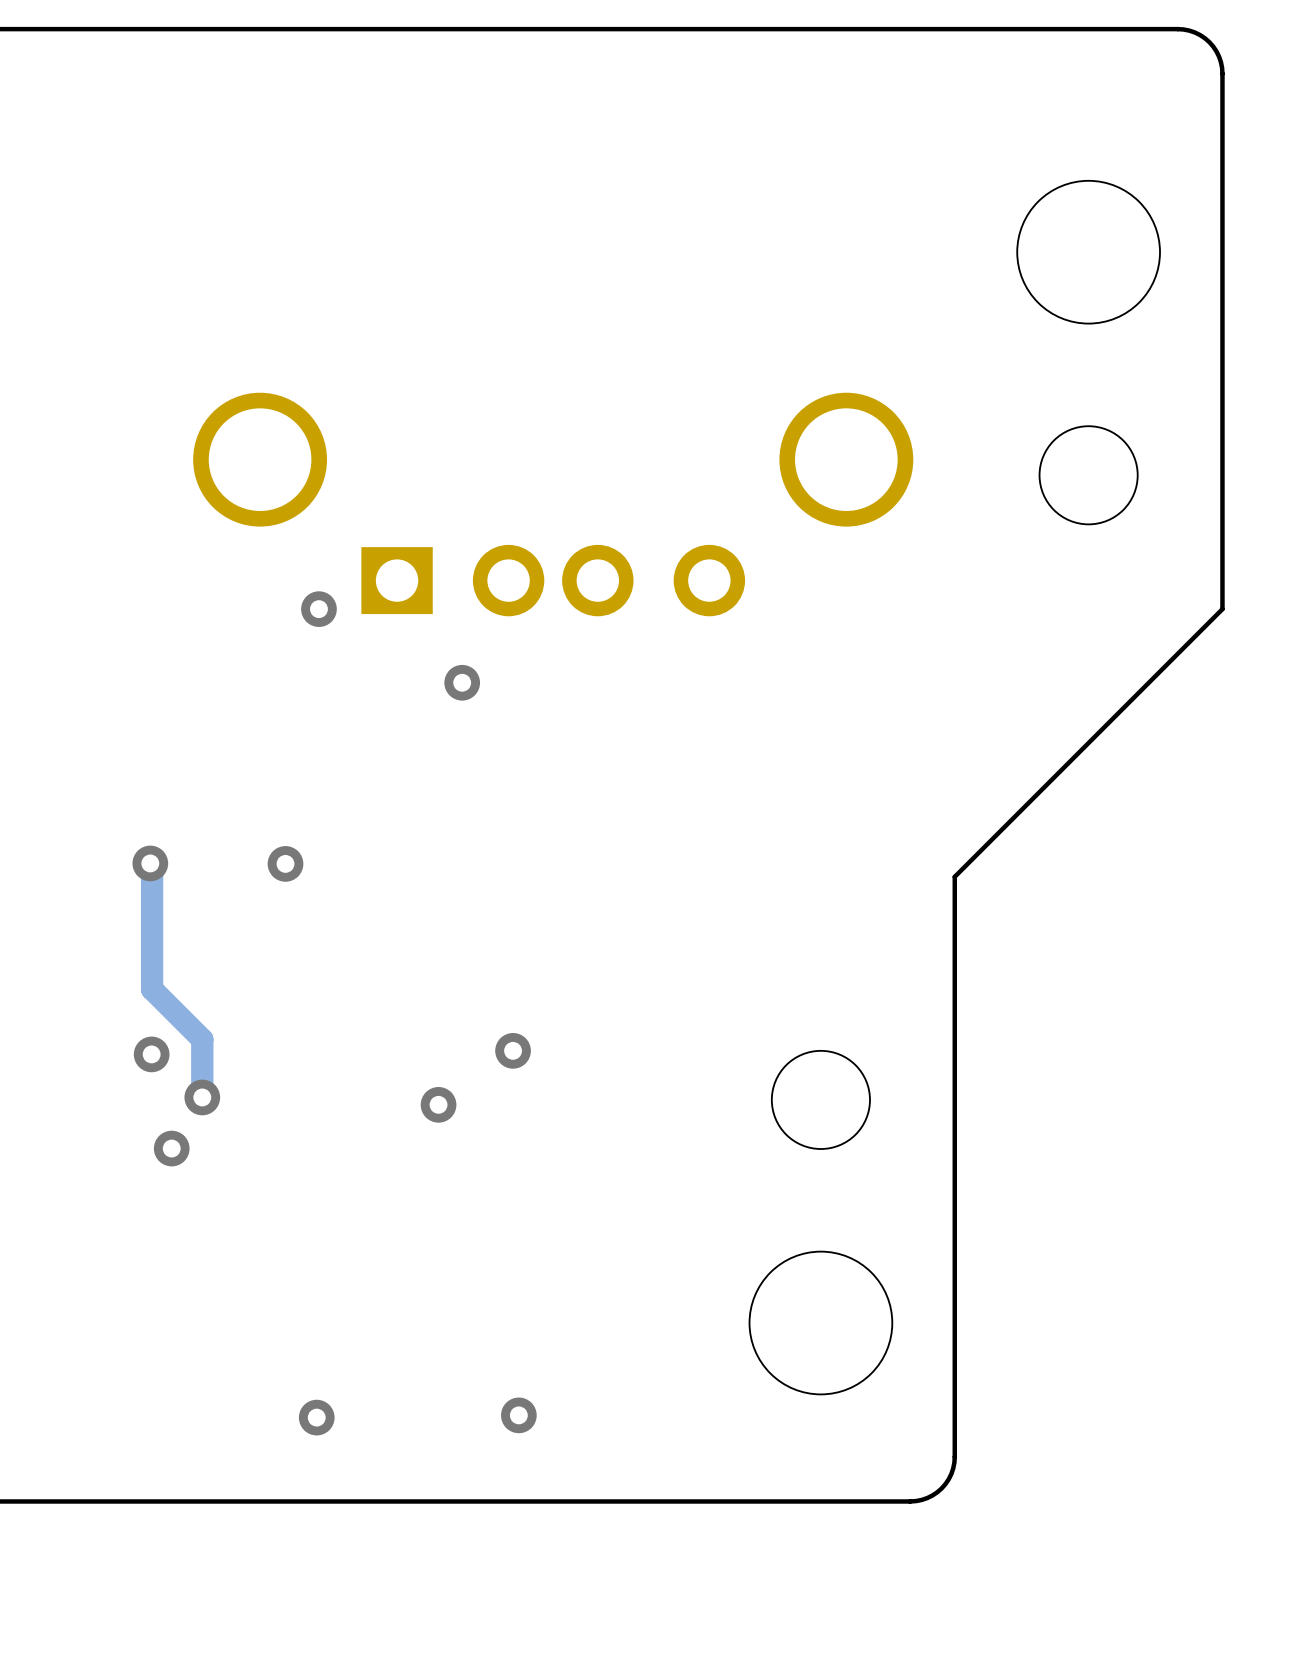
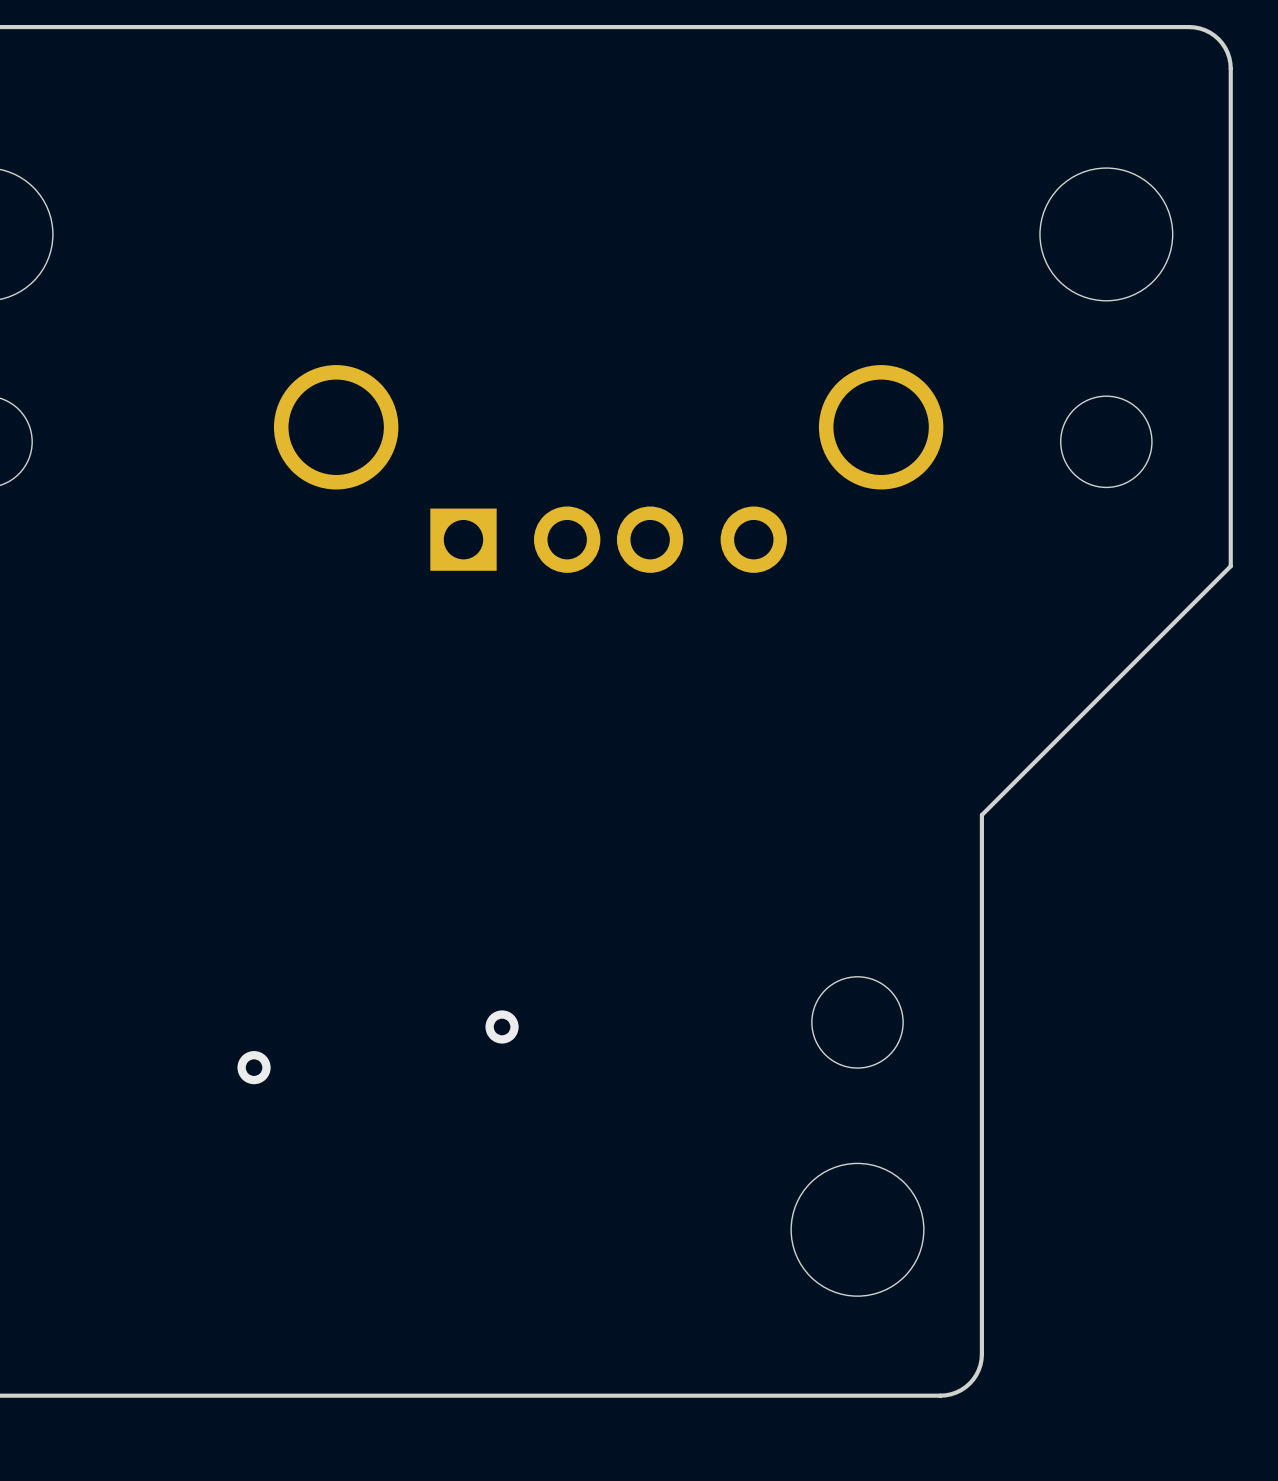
via: (318, 609) -> none
via: (462, 682) -> none
track: (150, 863) (152, 865) (152, 989) (202, 1039) (202, 1097) -> none
via: (150, 863) -> none
via: (285, 863) -> none
via: (513, 1050) -> none
via: (151, 1054) -> none
via: (202, 1097) -> none
via: (518, 1415) -> none
via: (316, 1417) -> none

